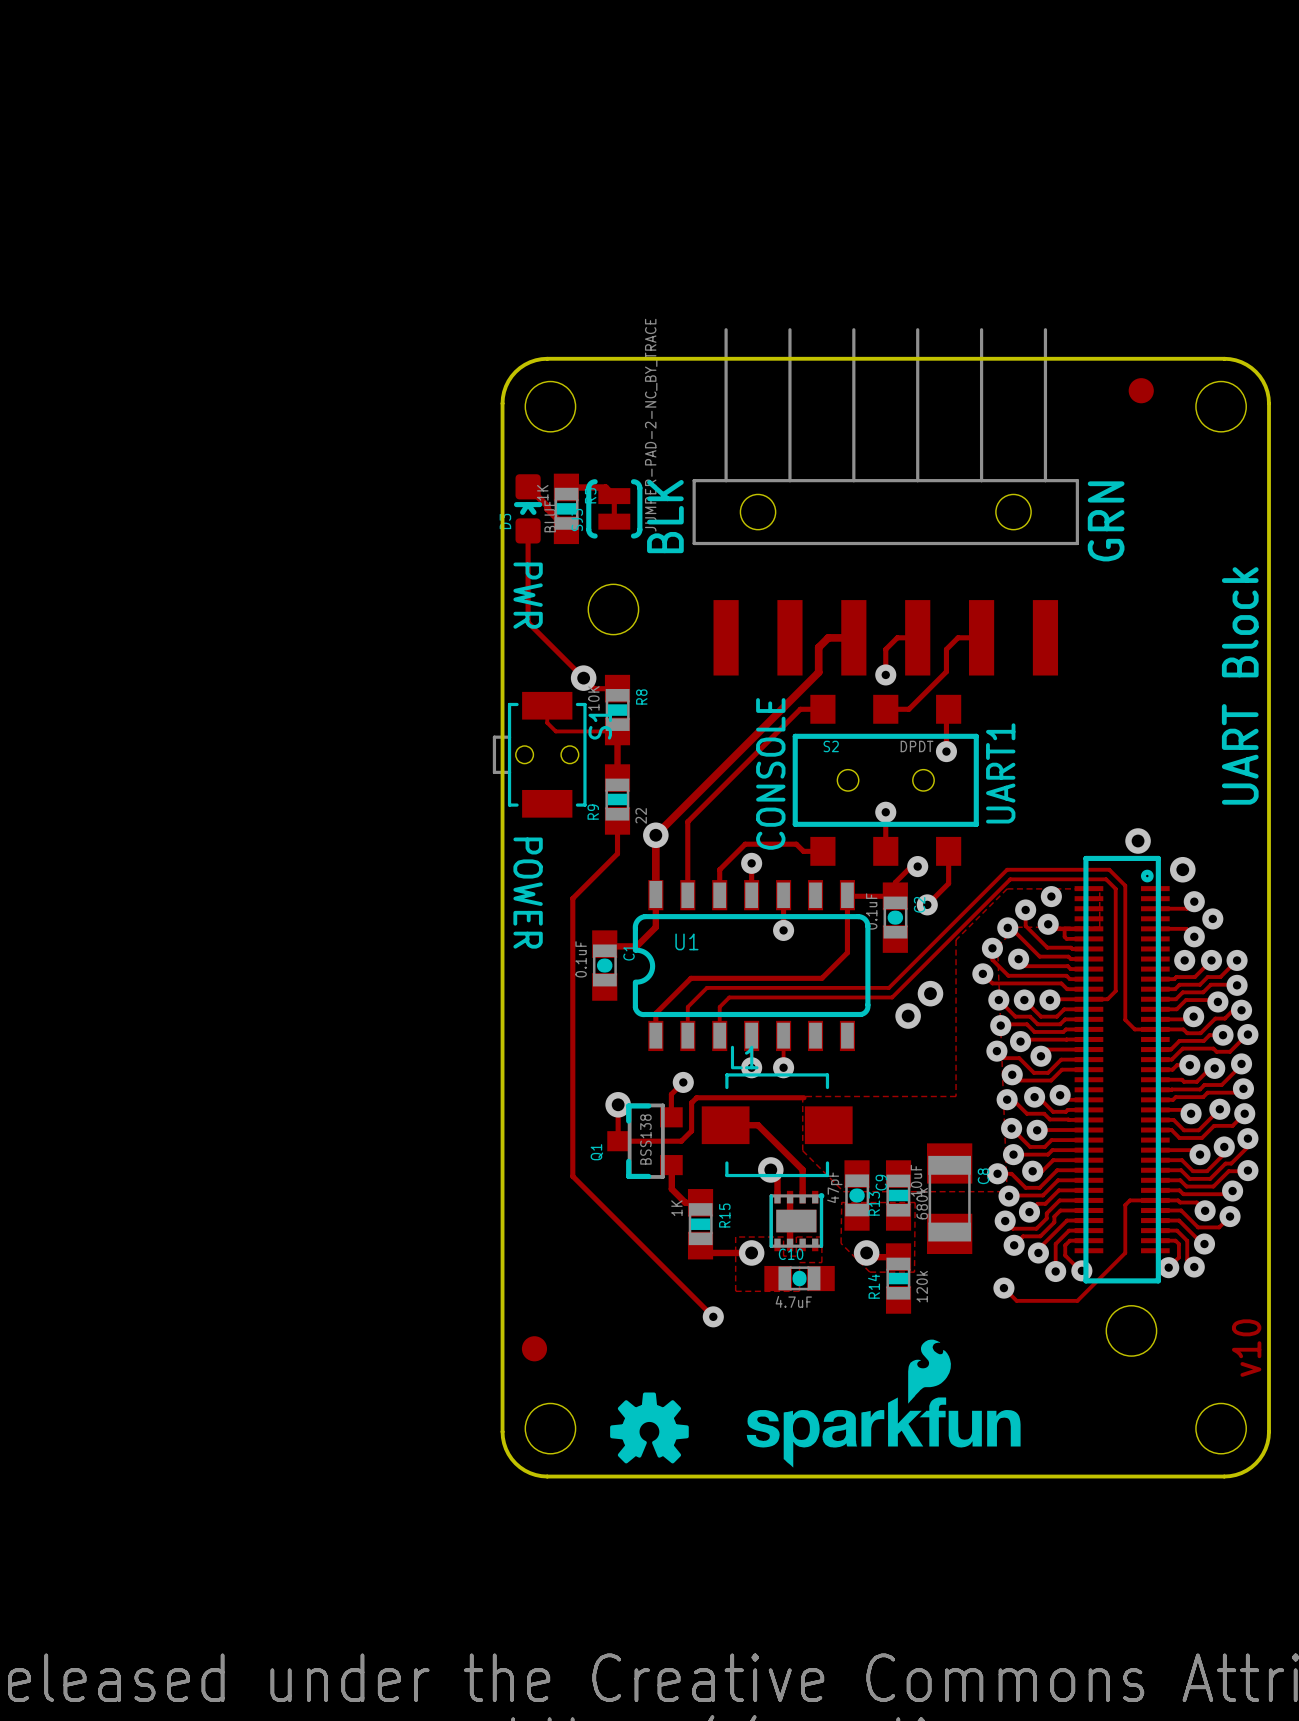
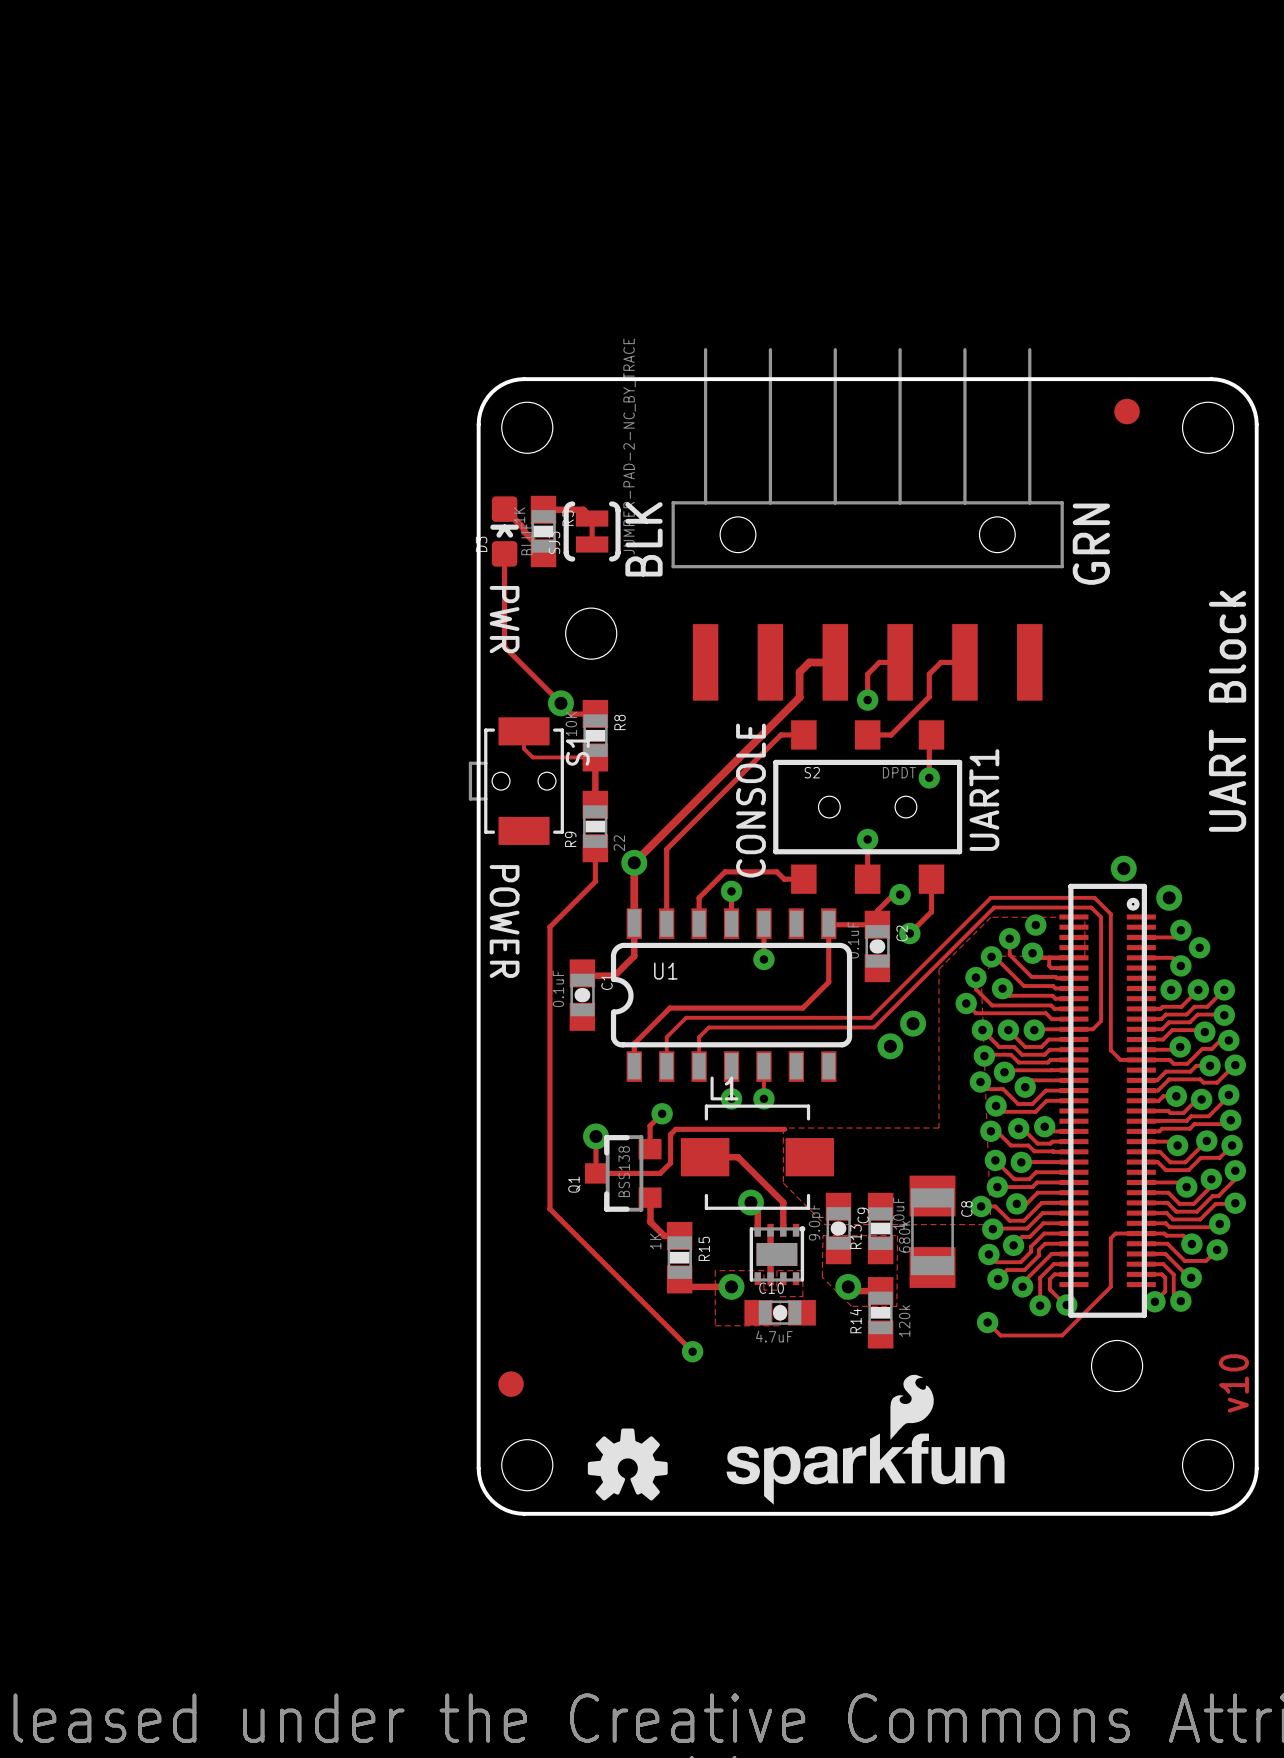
C9 value: 47pF (834, 1187) -> 9.0pF (816, 1222)

